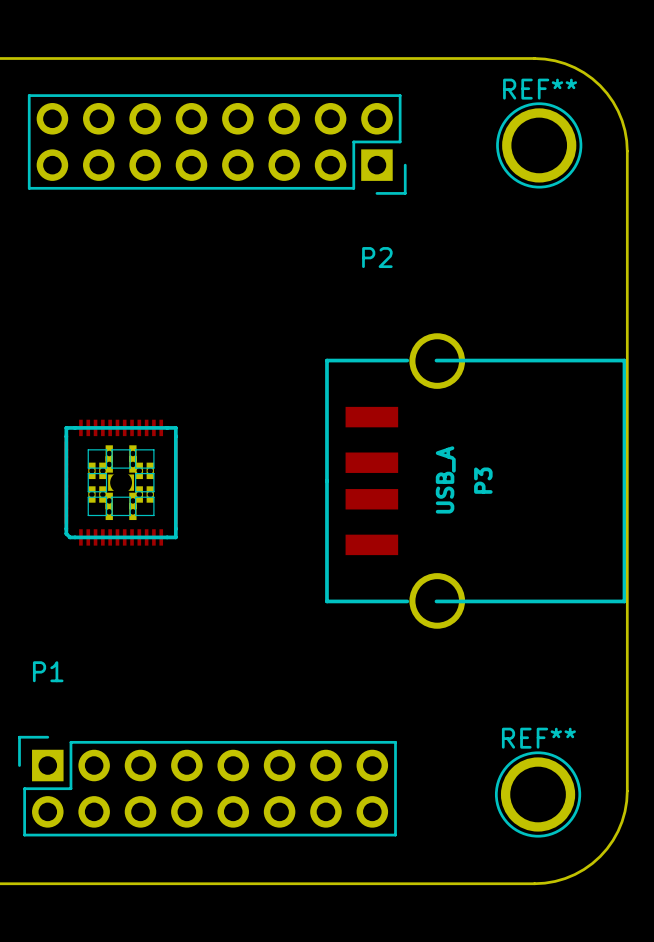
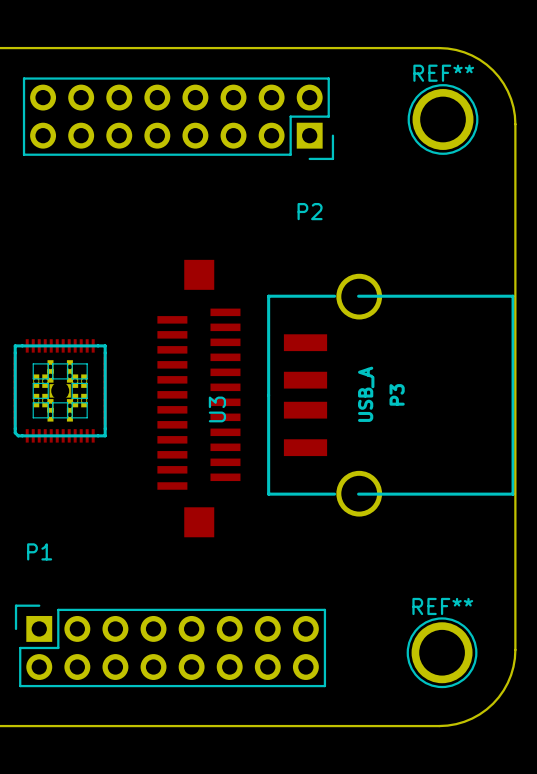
part position: (121, 482) -> (60, 390)
U3: none -> (198, 398)

